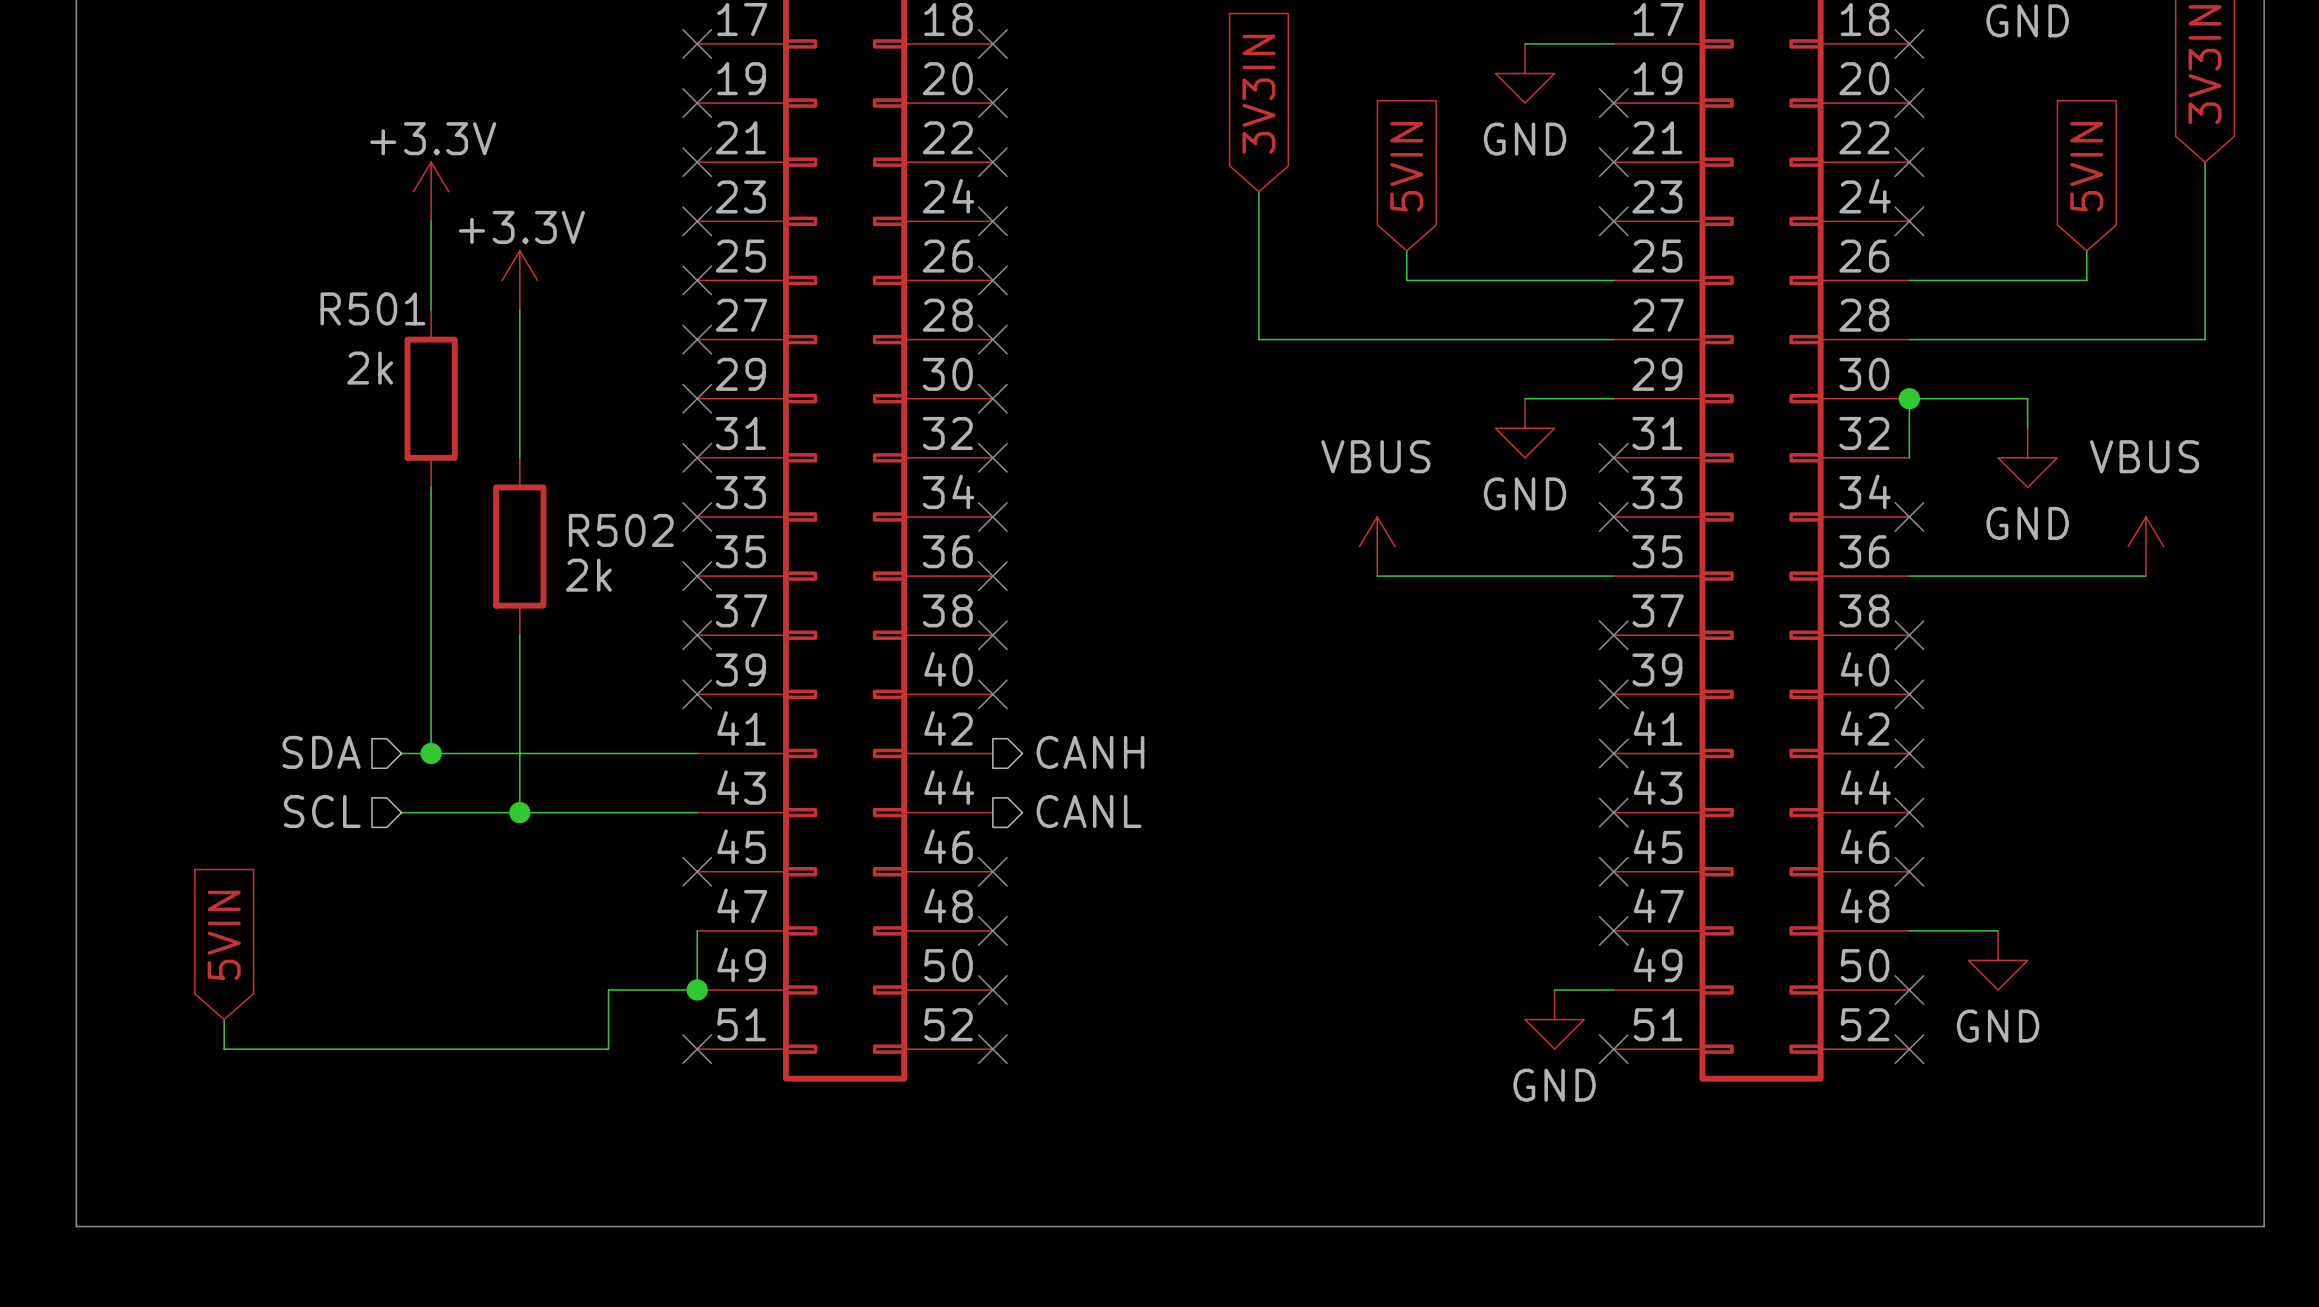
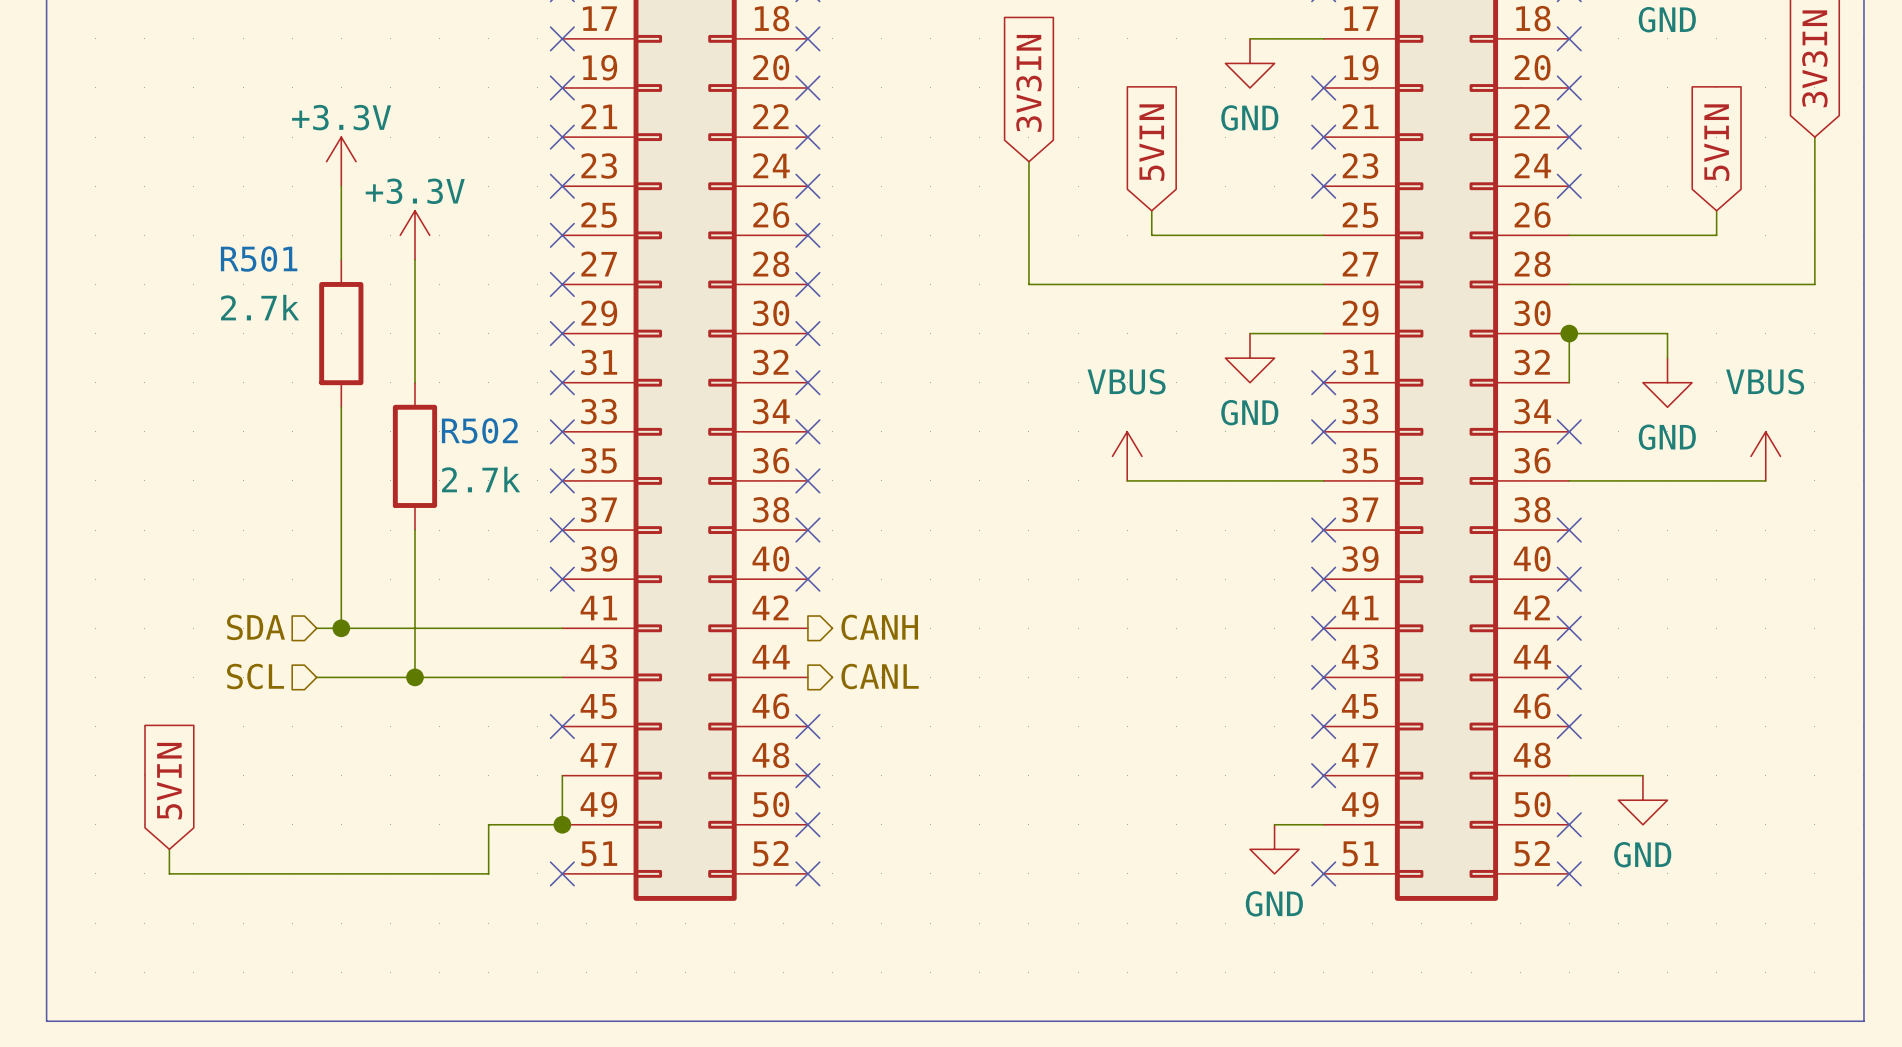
R501 name position: R501 (372, 308) -> R501 (259, 259)
R501 value: 2k (370, 368) -> 2.7k (260, 307)
R502 name position: R502 (621, 530) -> R502 (479, 430)
R502 value: 2k (588, 575) -> 2.7k (481, 479)

